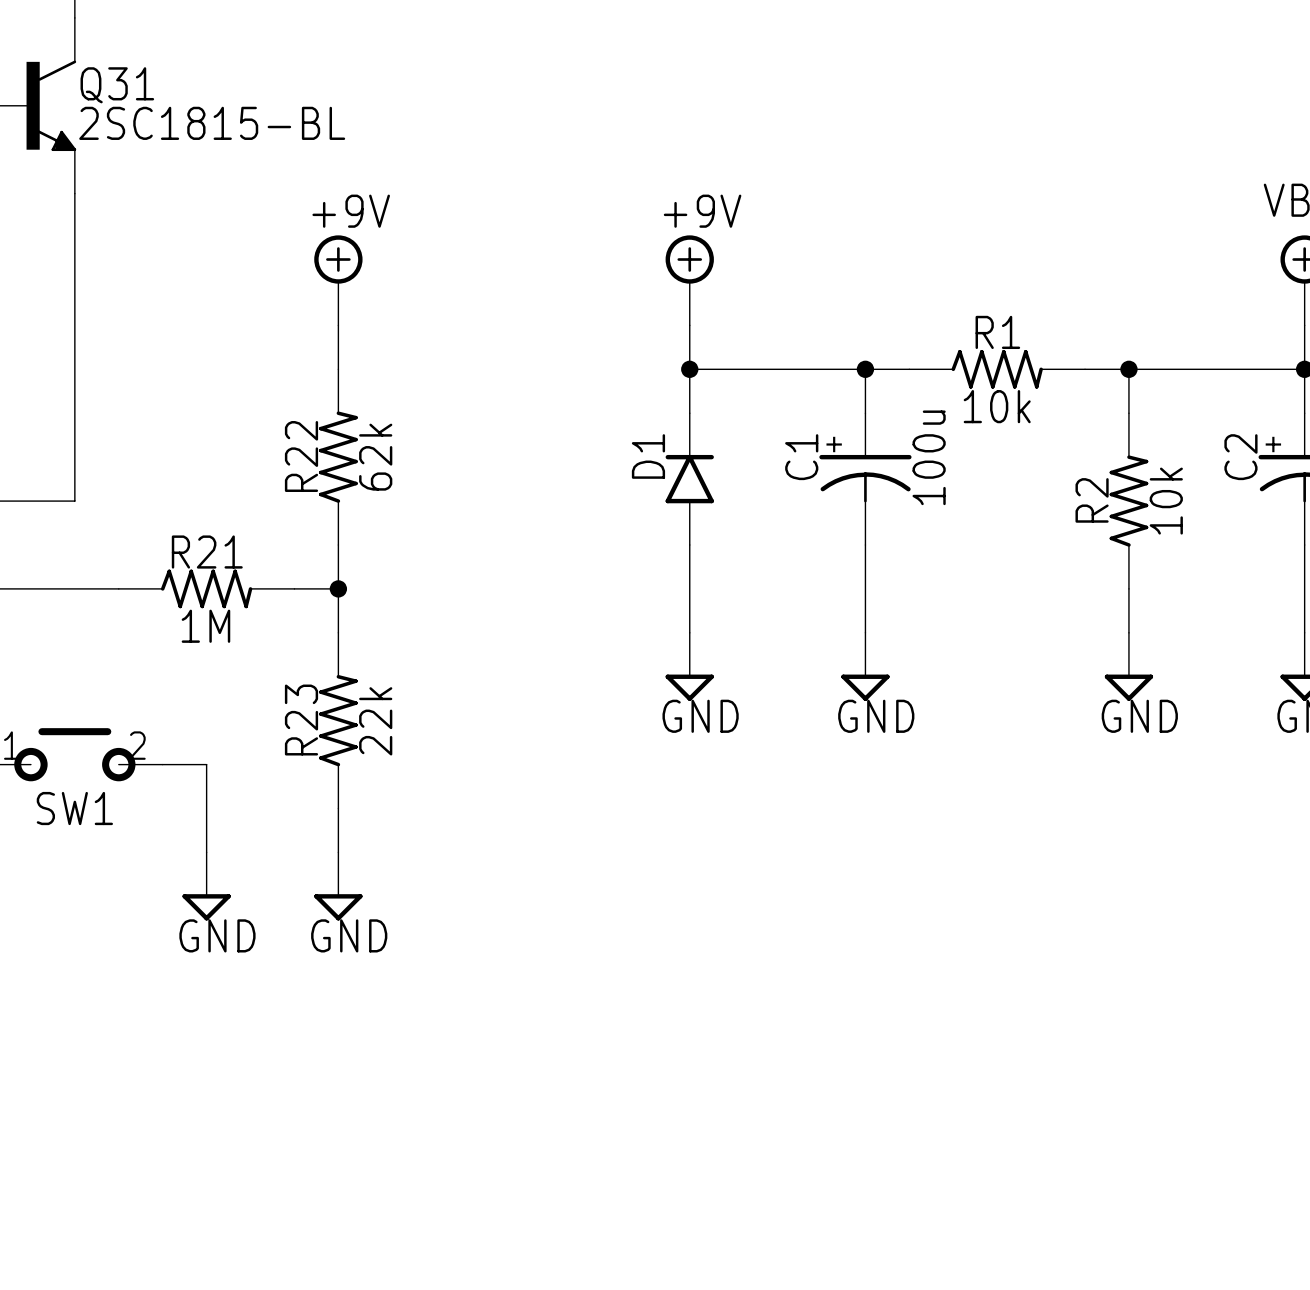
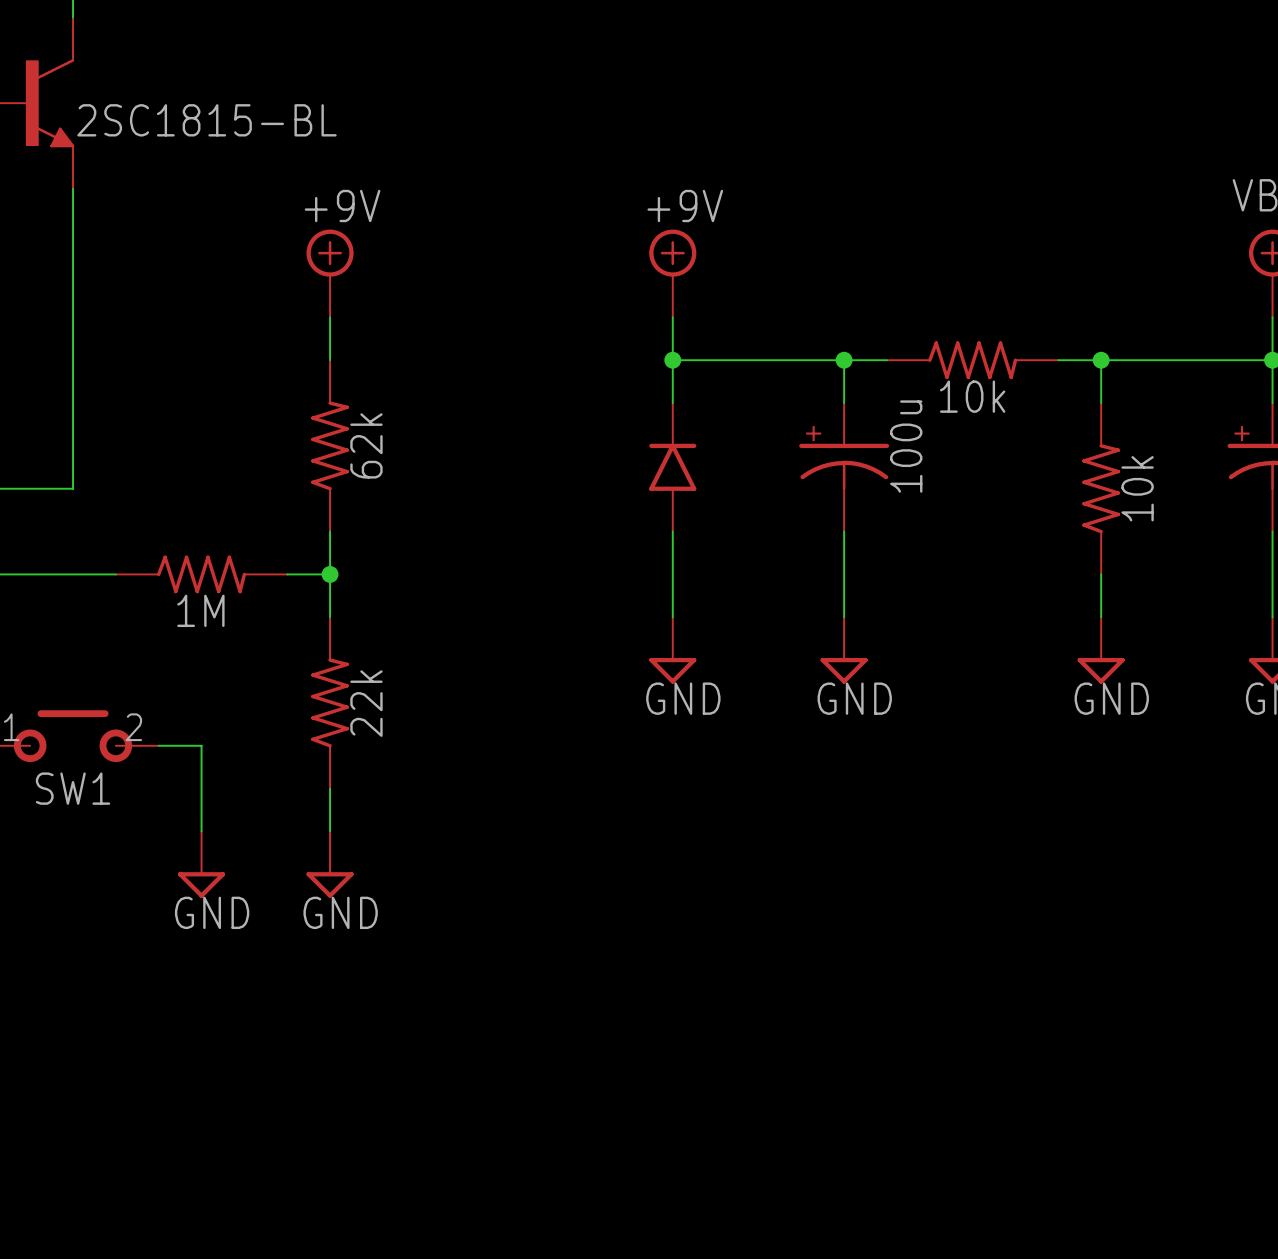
Q31 name: Q31 (117, 85) -> none
R1 name: R1 (997, 332) -> none
R22 name: R22 (301, 456) -> none
D1 name: D1 (648, 456) -> none
C1 name: C1 (801, 457) -> none
C2 name: C2 (1240, 457) -> none
R2 name: R2 (1092, 500) -> none
R21 name: R21 (207, 552) -> none
R23 name: R23 (301, 720) -> none

